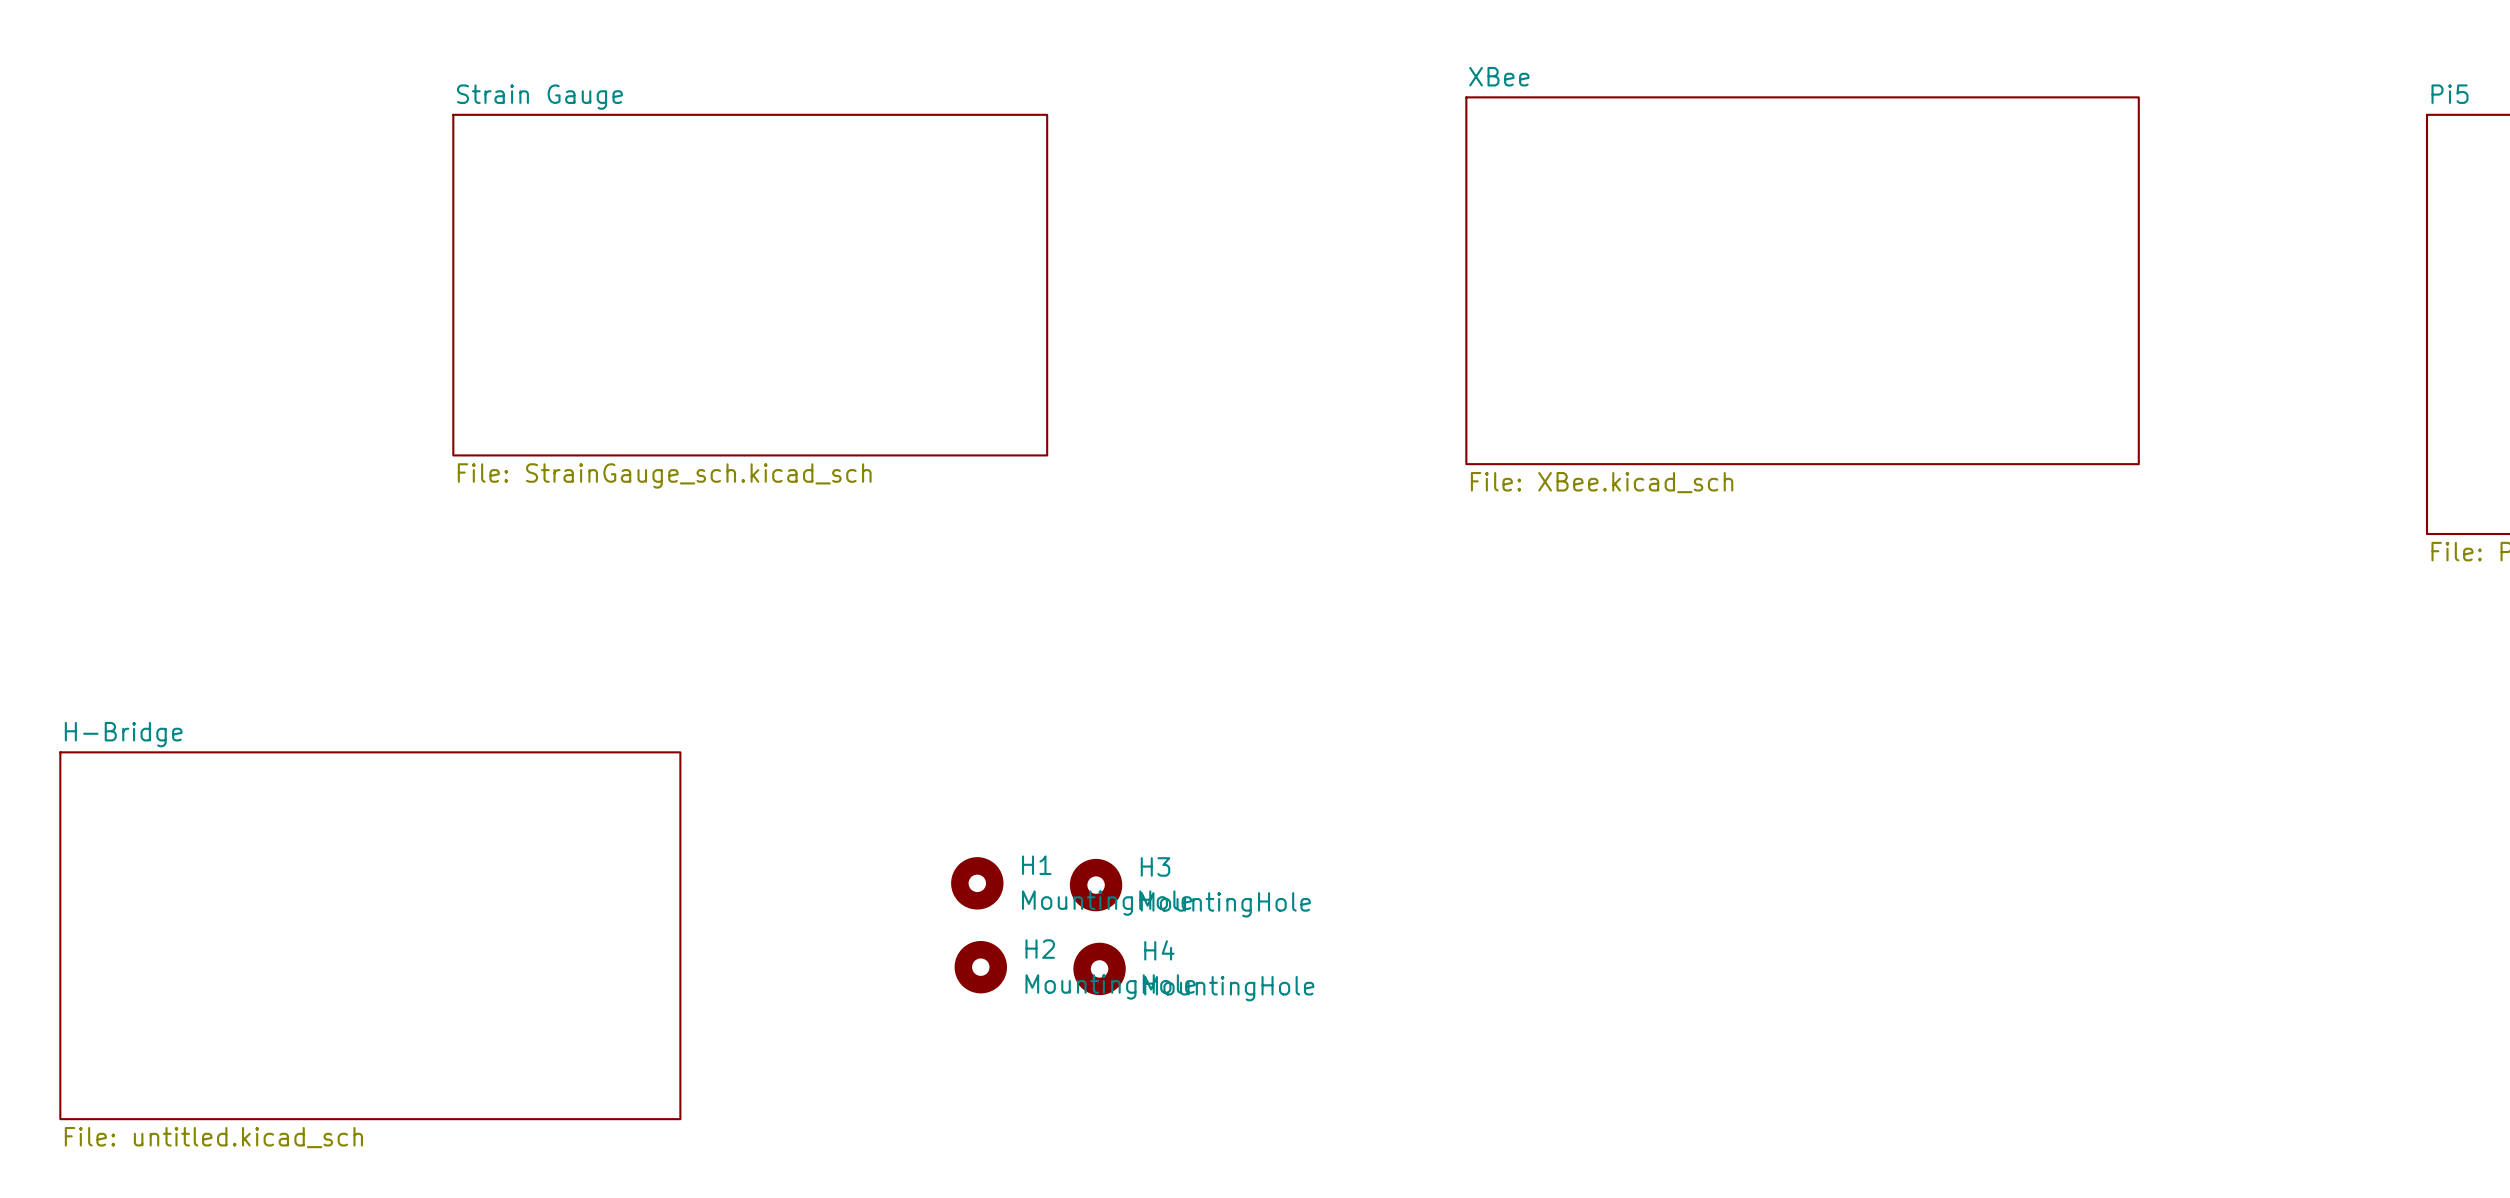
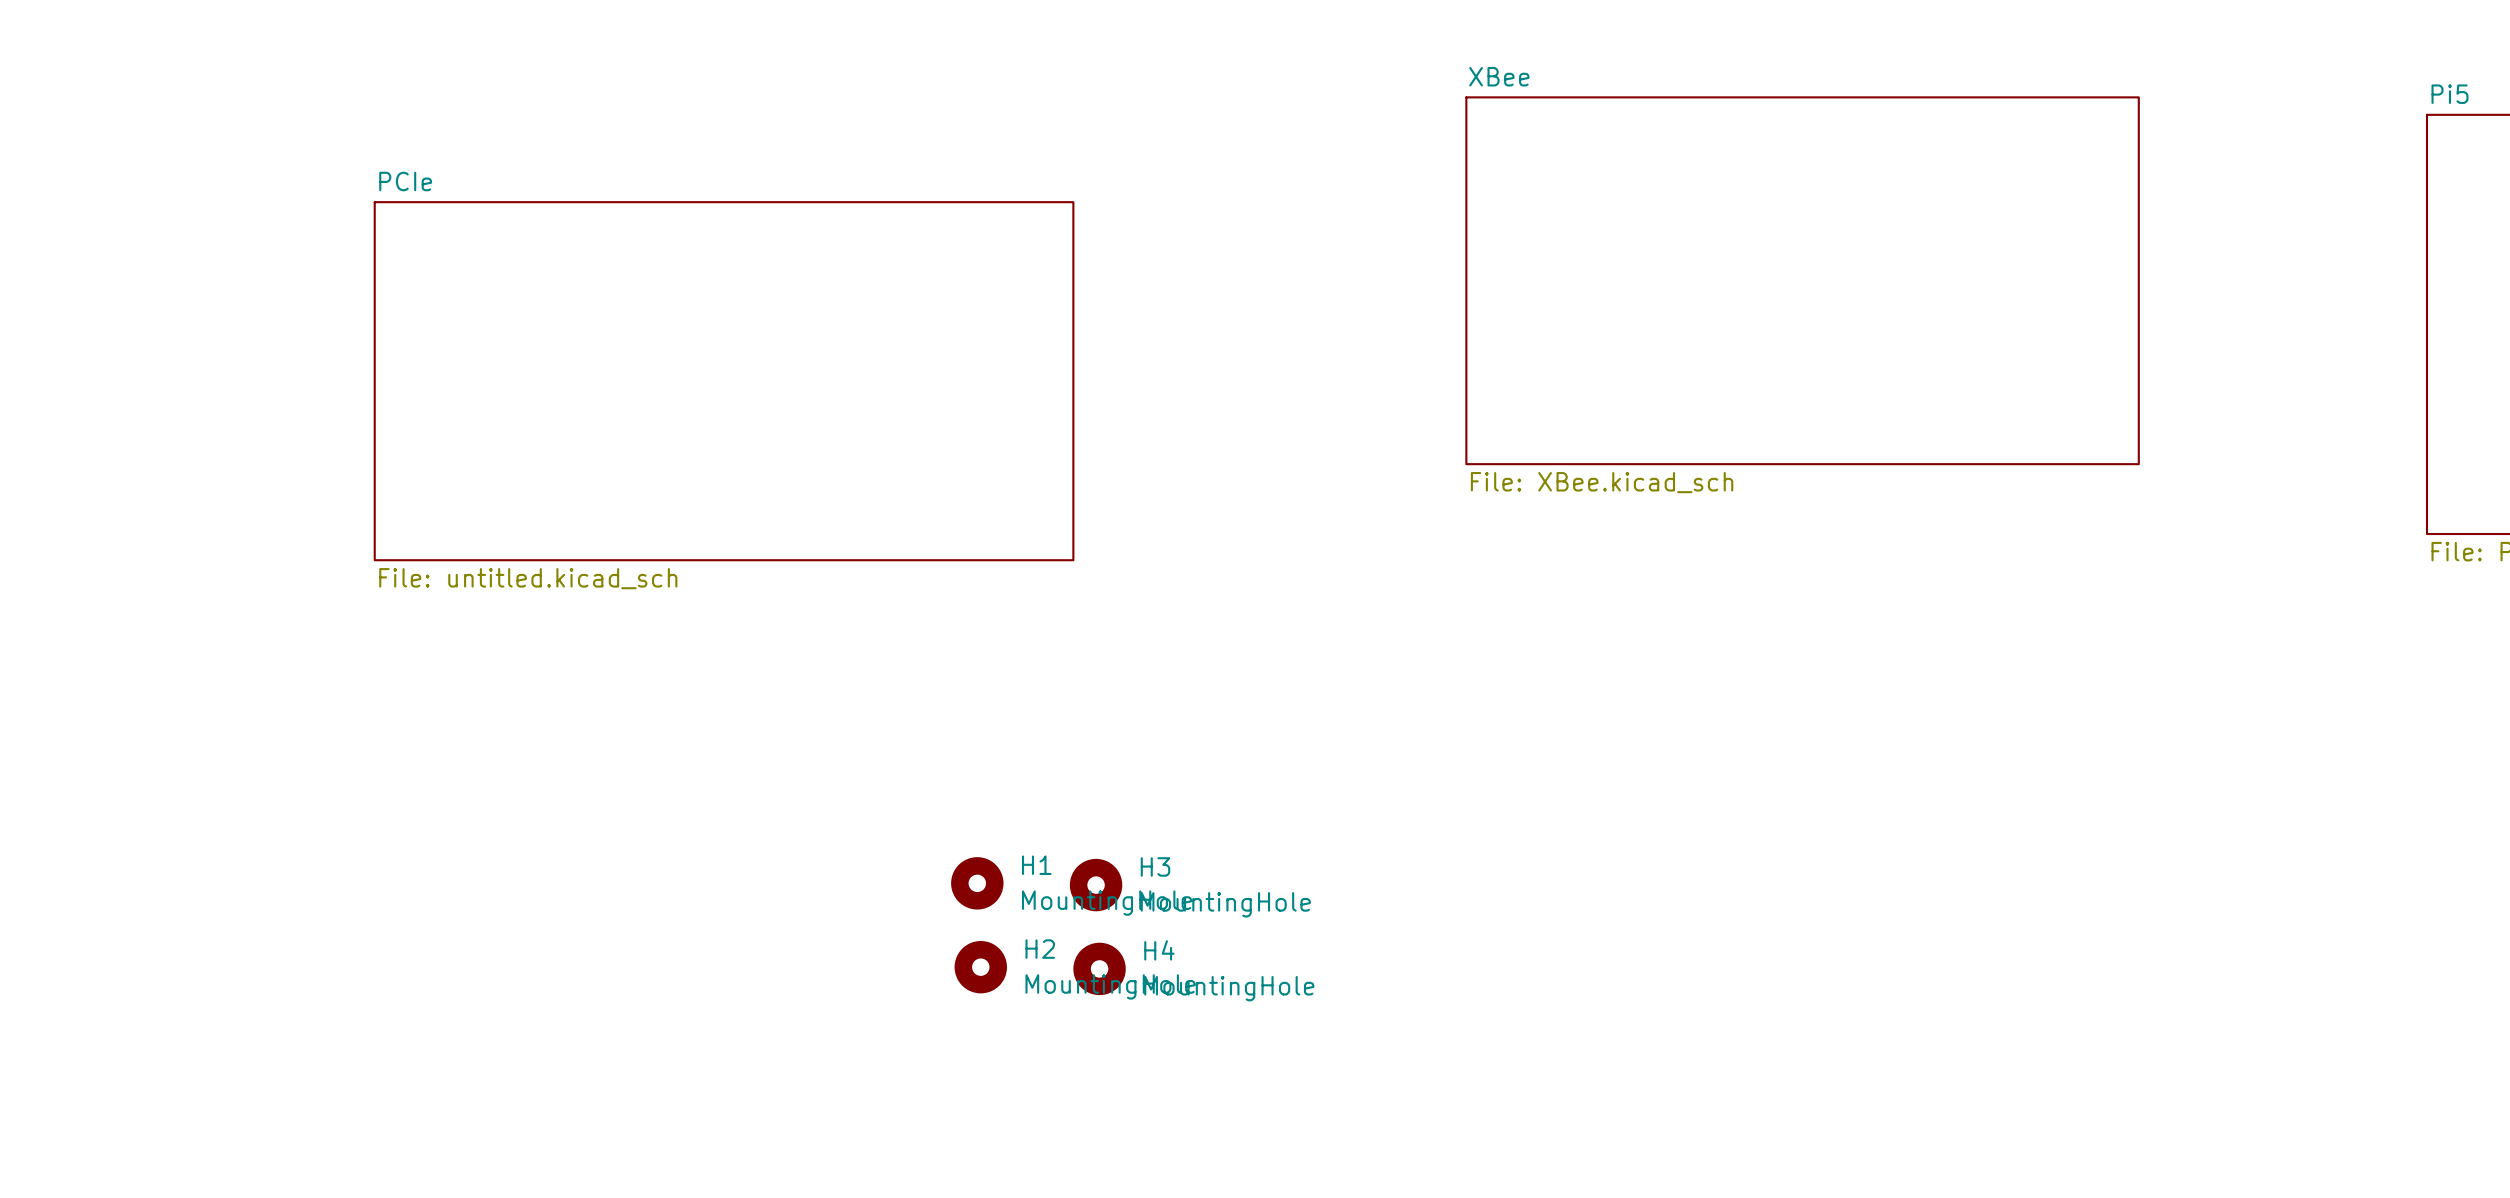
sheet Strain Gauge: File: StrainGauge_sch.kicad_sch (750, 285) -> none
sheet PCIe: none -> File: untitled.kicad_sch (724, 381)
sheet H-Bridge: File: untitled.kicad_sch (370, 935) -> none

